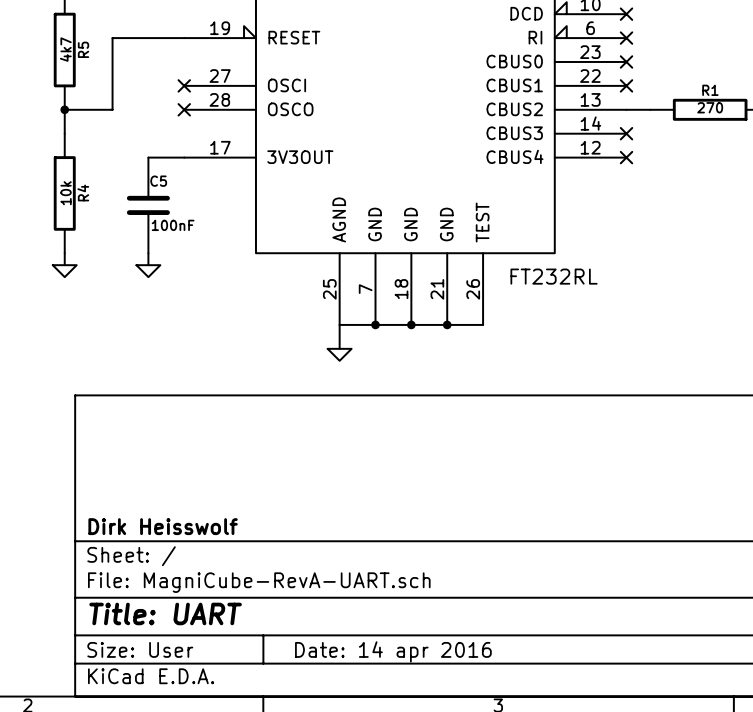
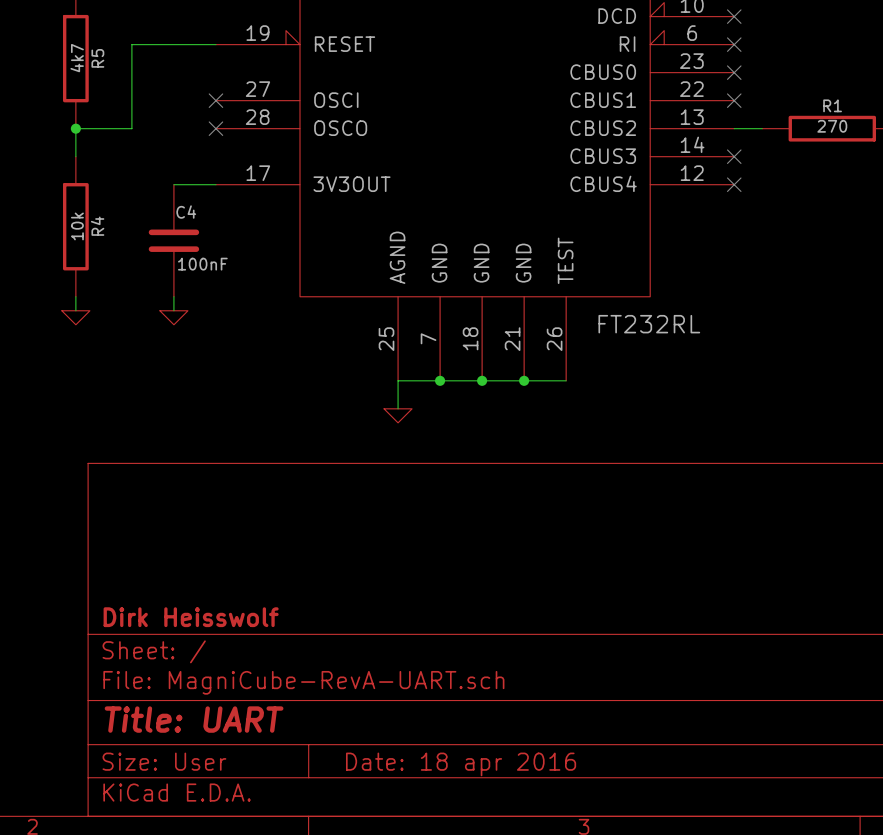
C5 name: C5 (158, 181) -> C4 (186, 212)
title block: Date: 14 apr 2016 (393, 651) -> Date: 18 apr 2016 (461, 764)

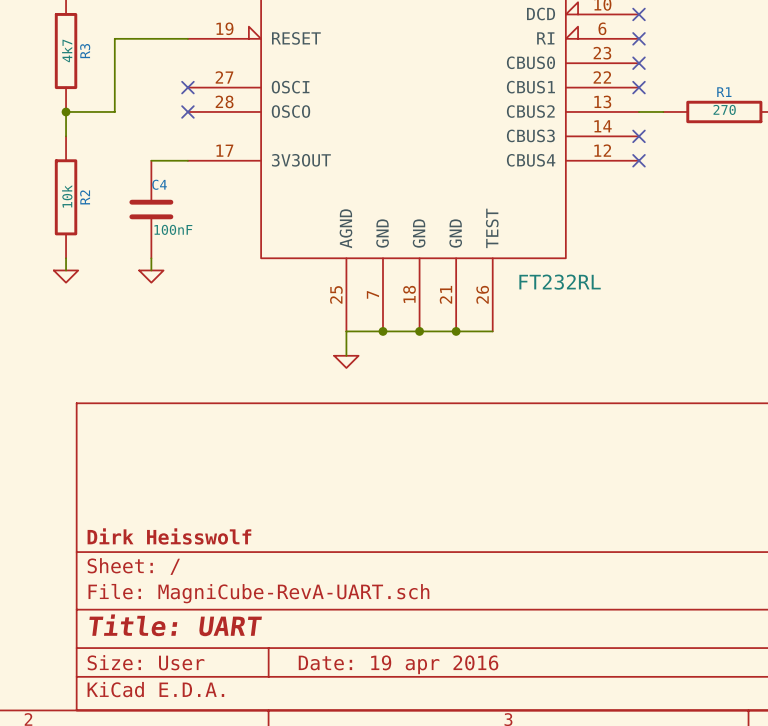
R5 name: R5 (97, 58) -> R3 (85, 51)
R4 name: R4 (97, 226) -> R2 (85, 197)
title block: Date: 18 apr 2016 (461, 764) -> Date: 19 apr 2016 (398, 664)

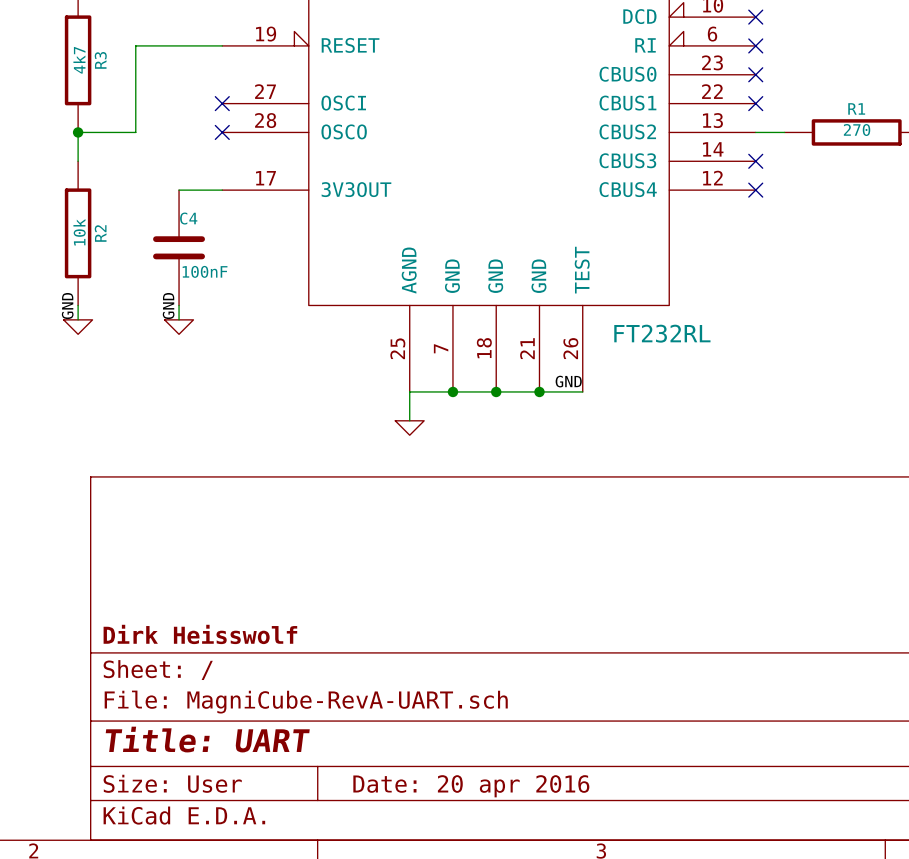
label: none -> GND (67, 306)
label: none -> GND (168, 306)
label: none -> GND (568, 381)
title block: Date: 19 apr 2016 (398, 664) -> Date: 20 apr 2016 (471, 786)

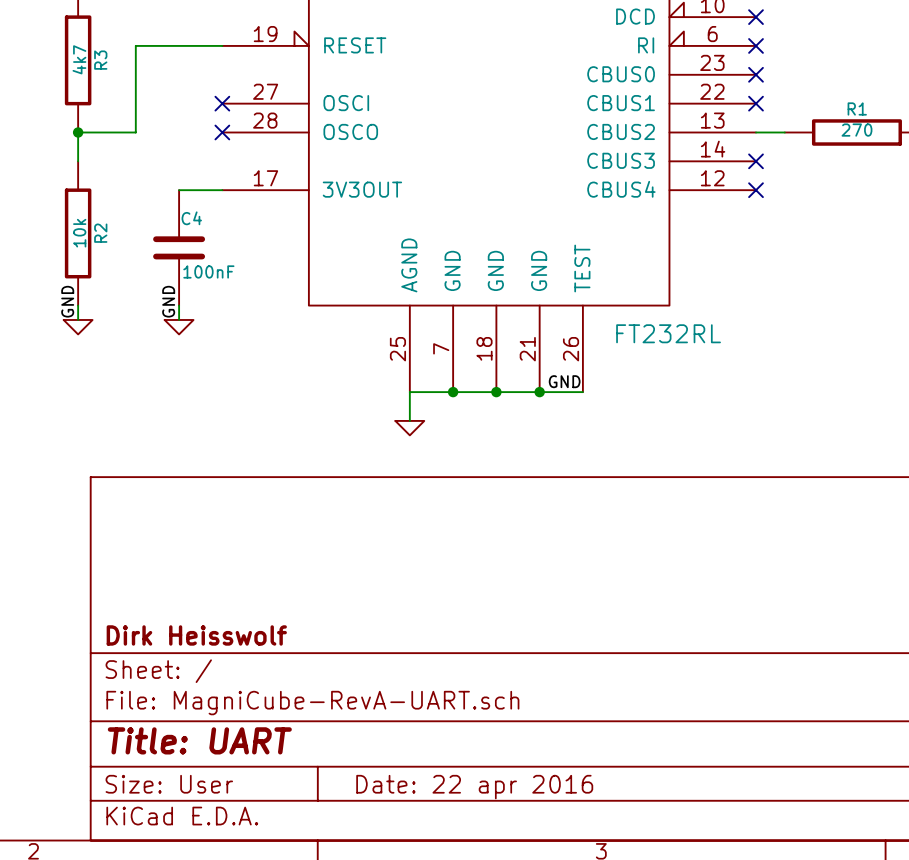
title block: Date: 20 apr 2016 (471, 786) -> Date: 22 apr 2016 (474, 787)

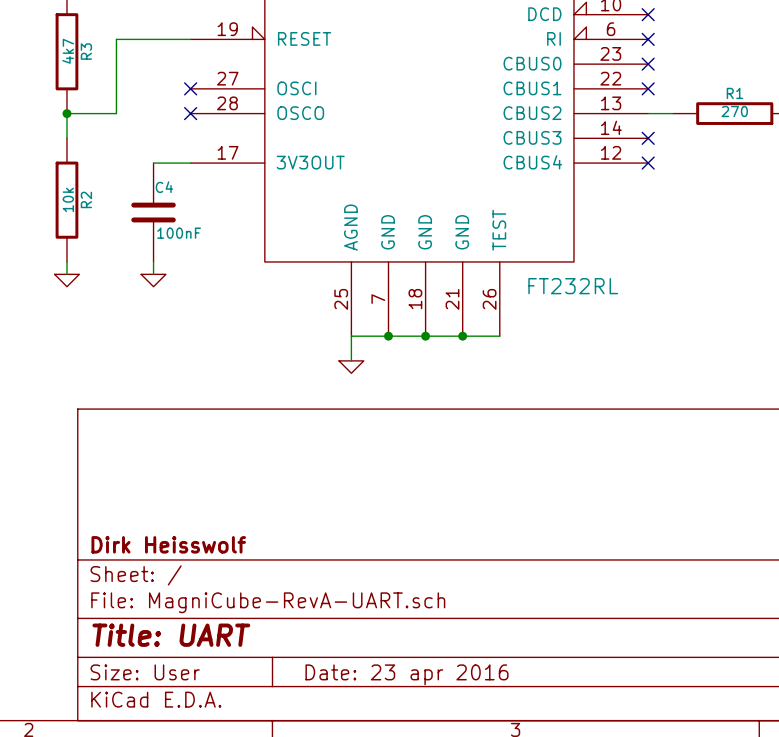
label: GND (67, 301) -> none
label: GND (168, 301) -> none
label: GND (564, 381) -> none
title block: Date: 22 apr 2016 (474, 787) -> Date: 23 apr 2016 (407, 674)

